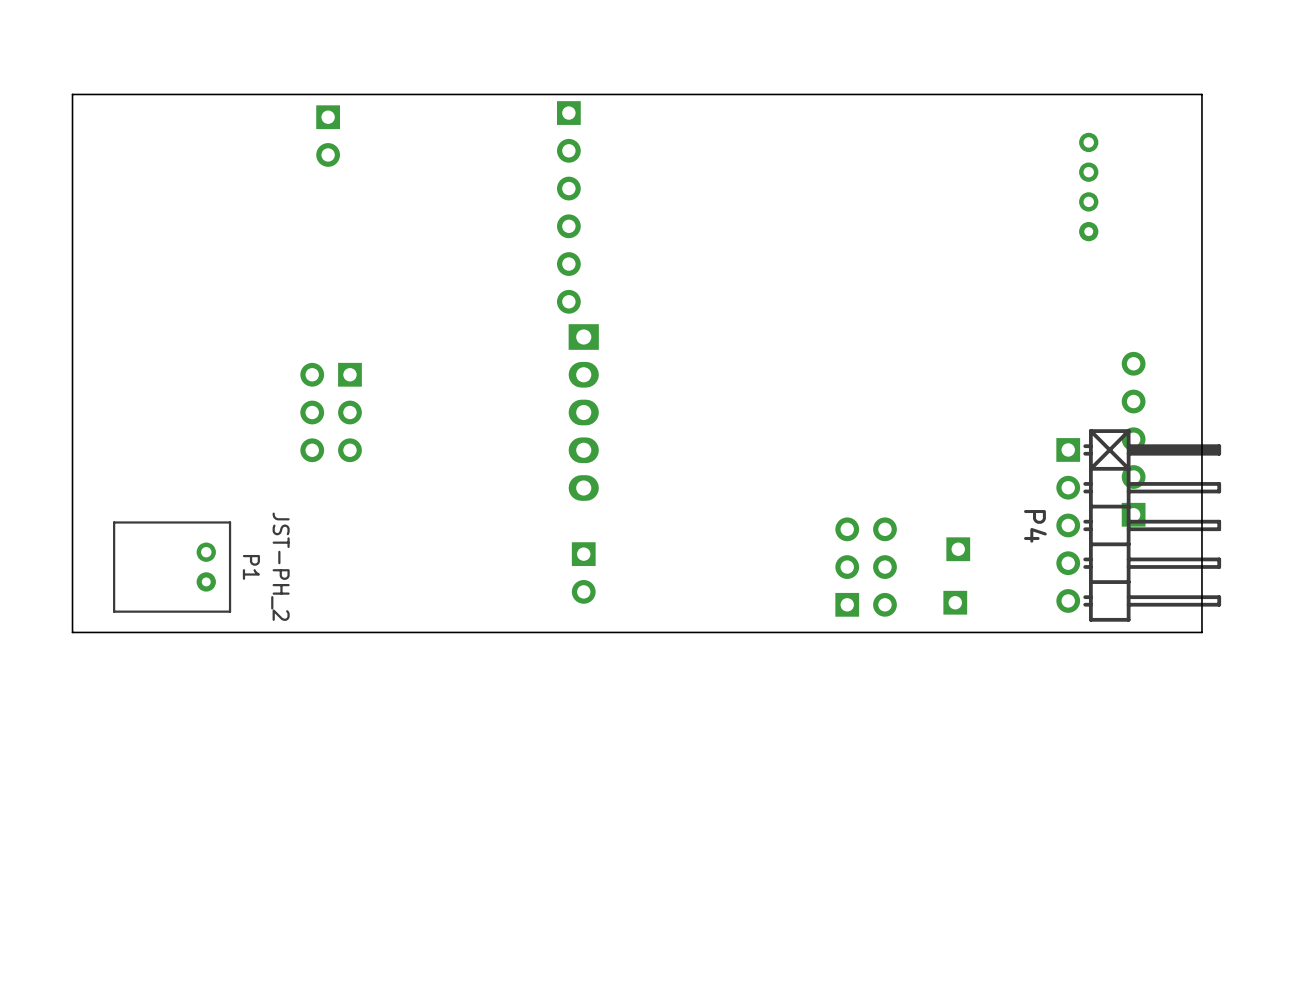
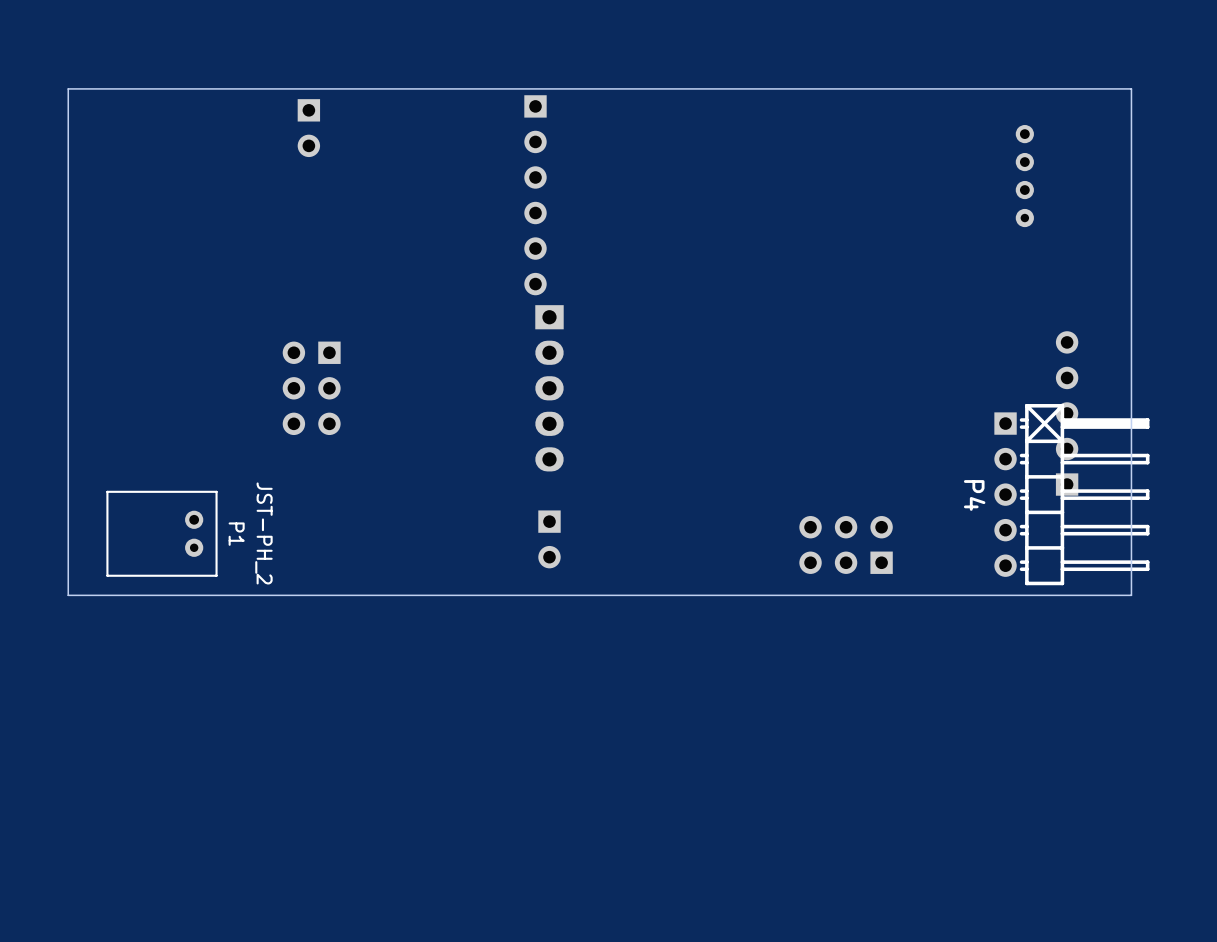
part: (958, 549) -> none
part rotation: 0° (866, 567) -> 90° counterclockwise (846, 544)
part: (955, 602) -> none

